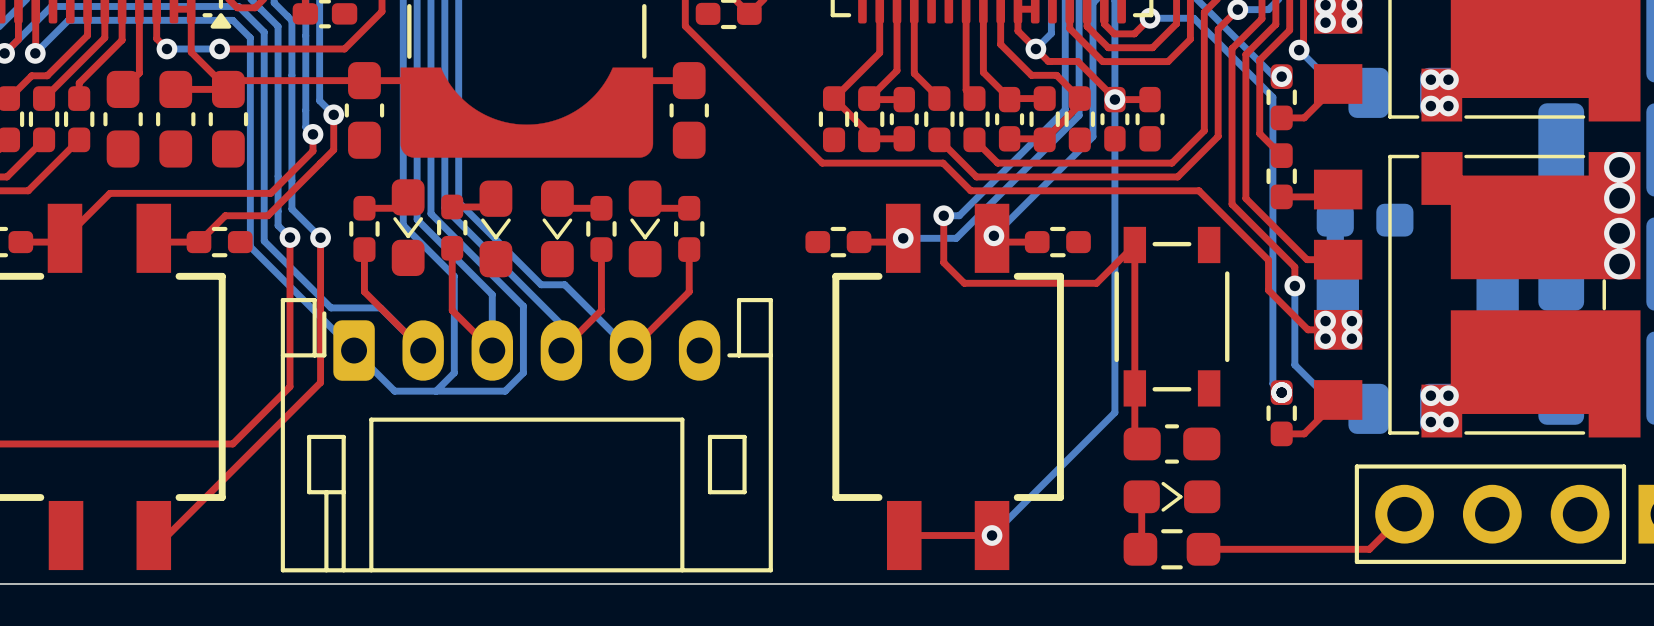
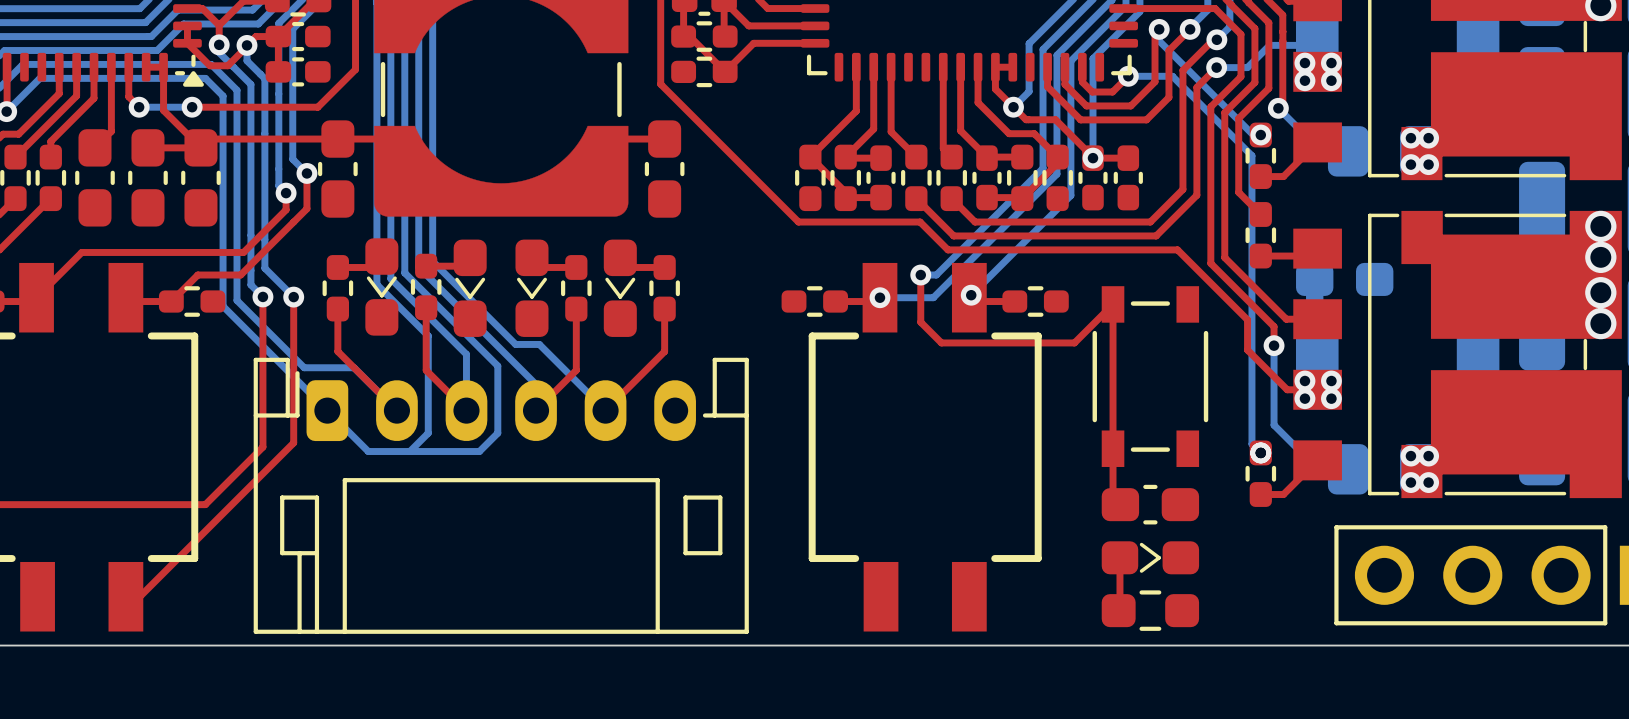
bottom track: (1114, 99) (1114, 412) (992, 535) -> none
top track: (1404, 514) (1369, 549) (1203, 549) -> none
top track: (904, 535) (992, 535) -> none
via: (992, 535) -> none

